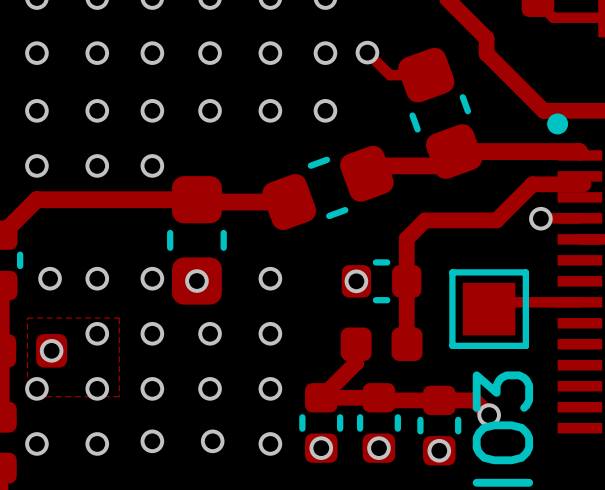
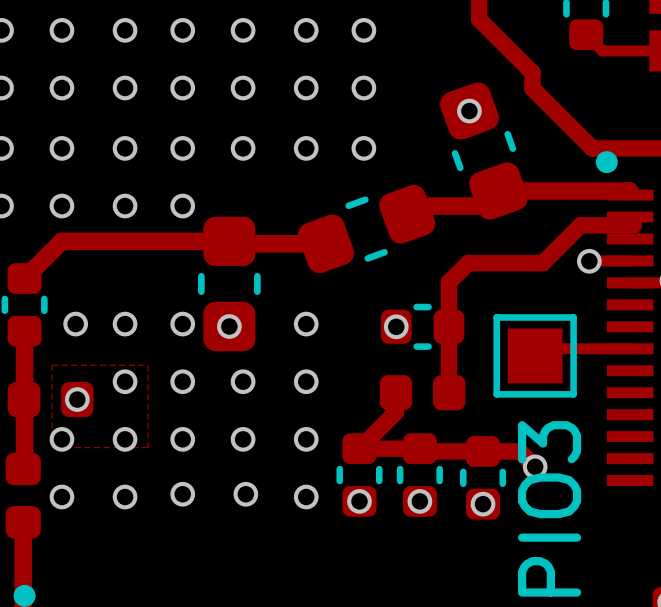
track: (367, 52) (389, 75) (426, 75) -> none
via: (367, 52) -> none
via: none -> (469, 111)

